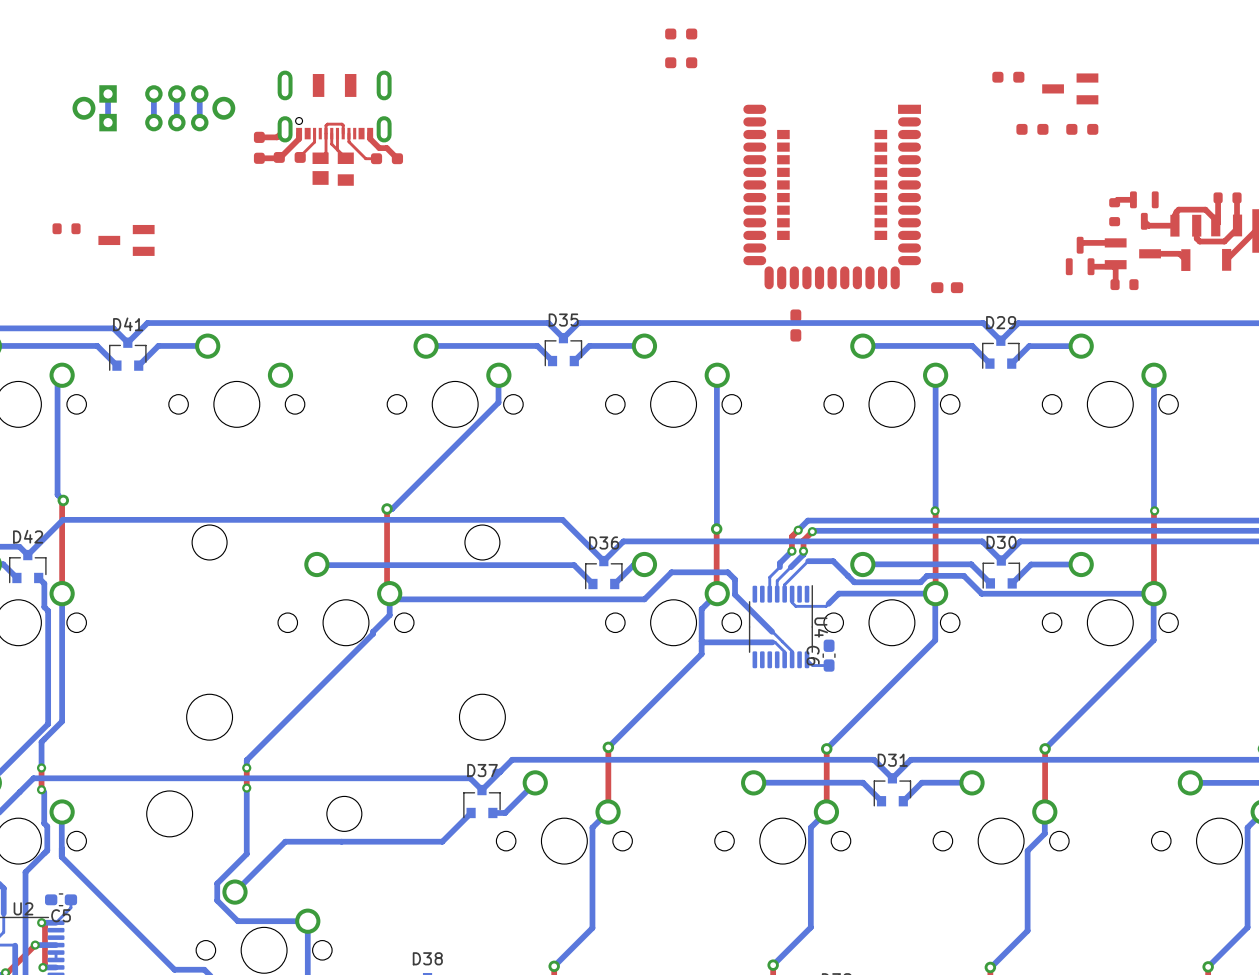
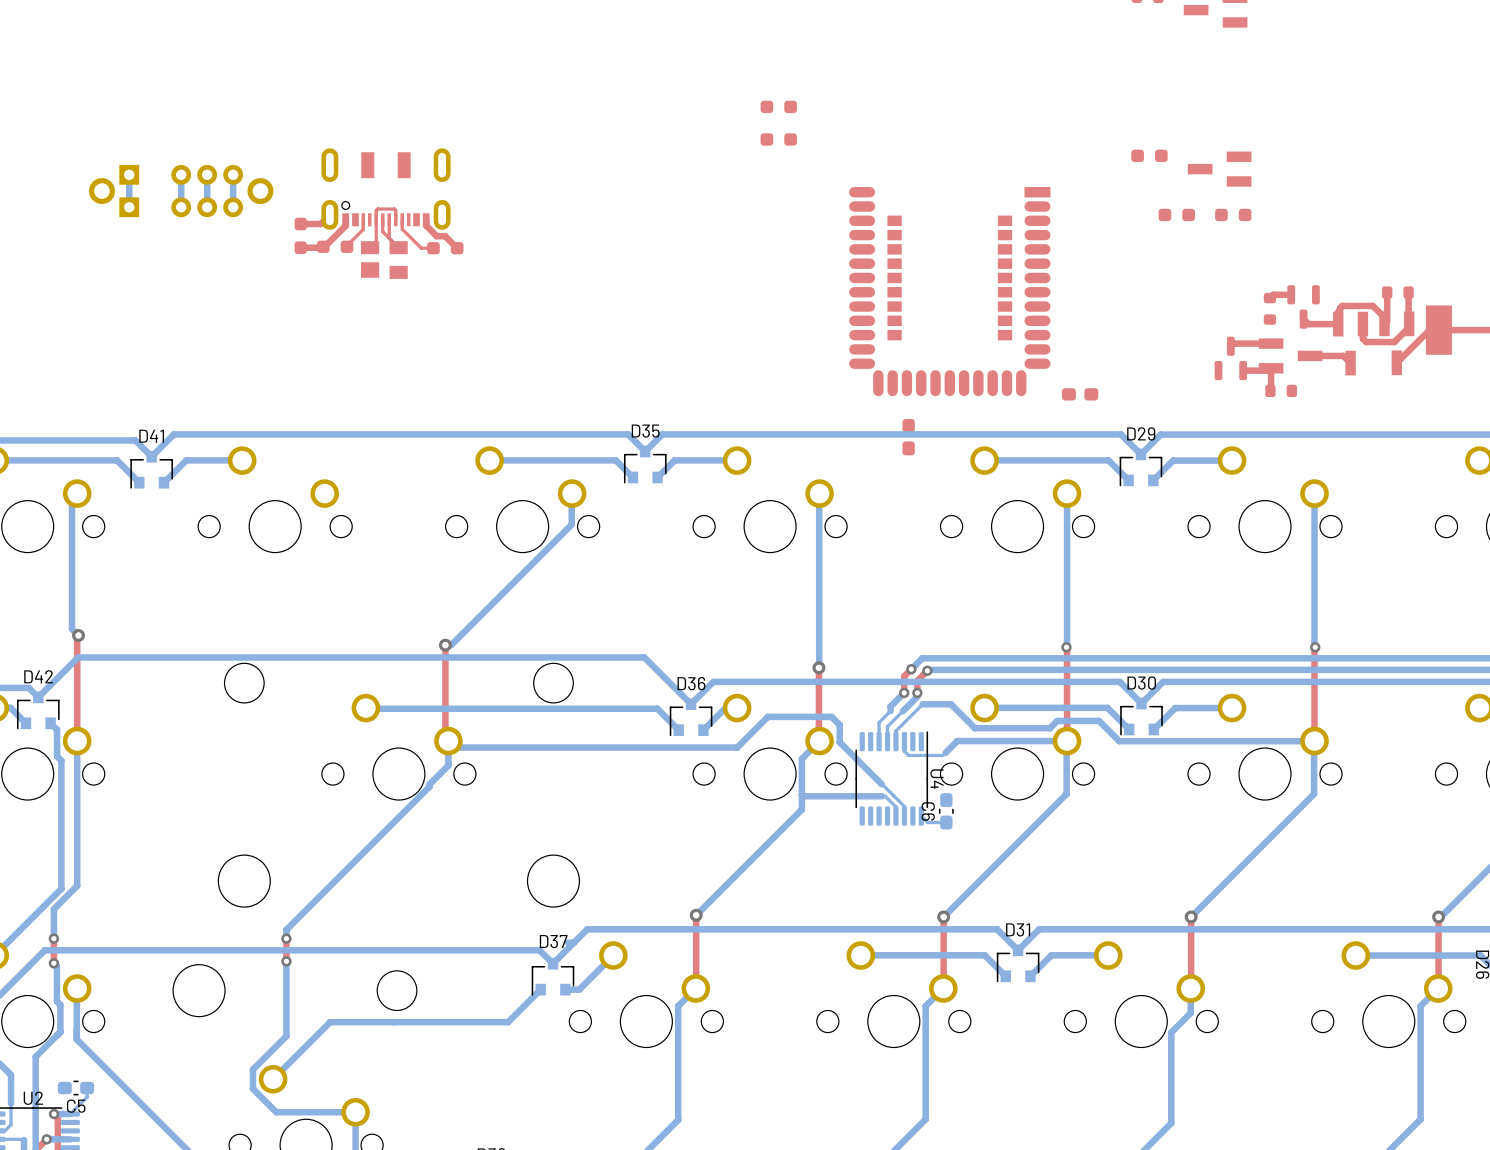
part: (66, 228) -> none
part: (126, 240) -> none

